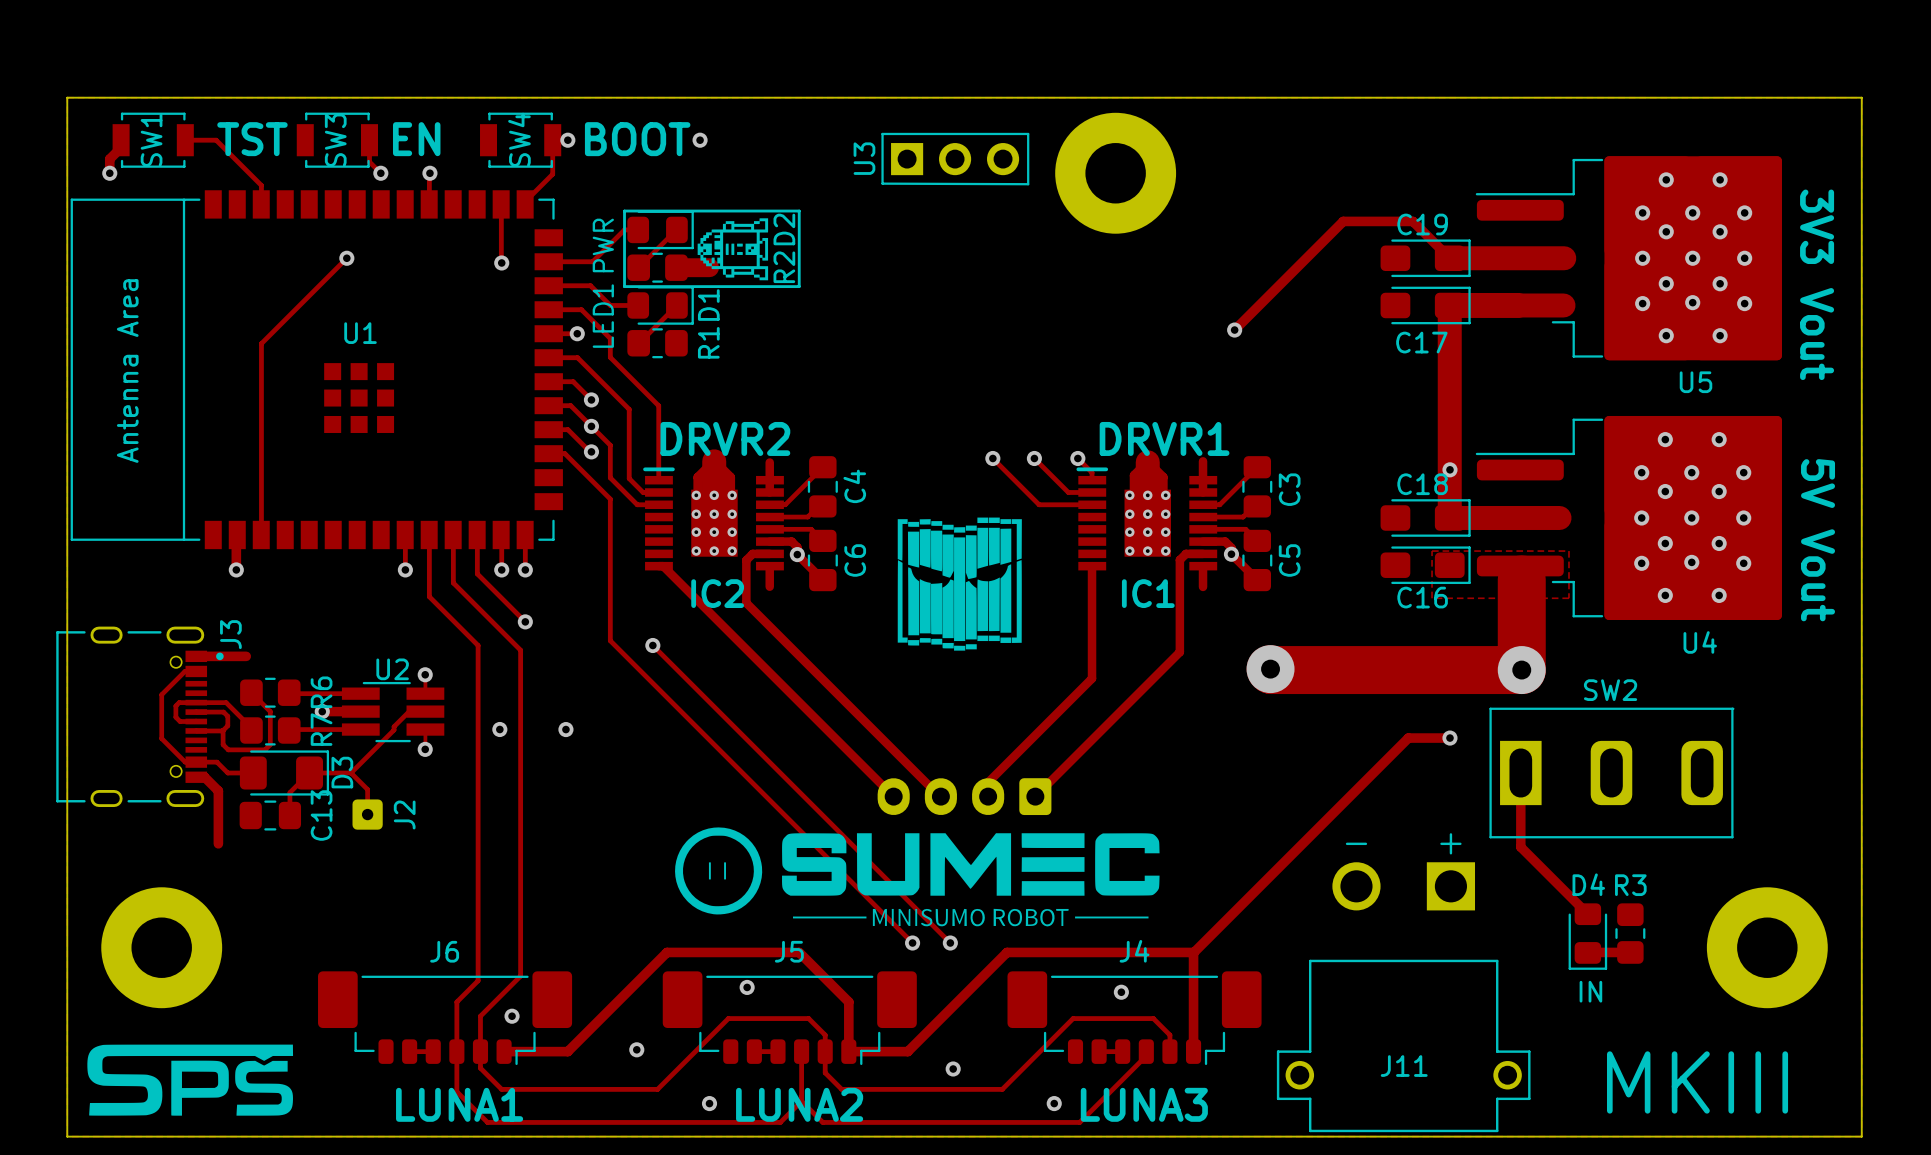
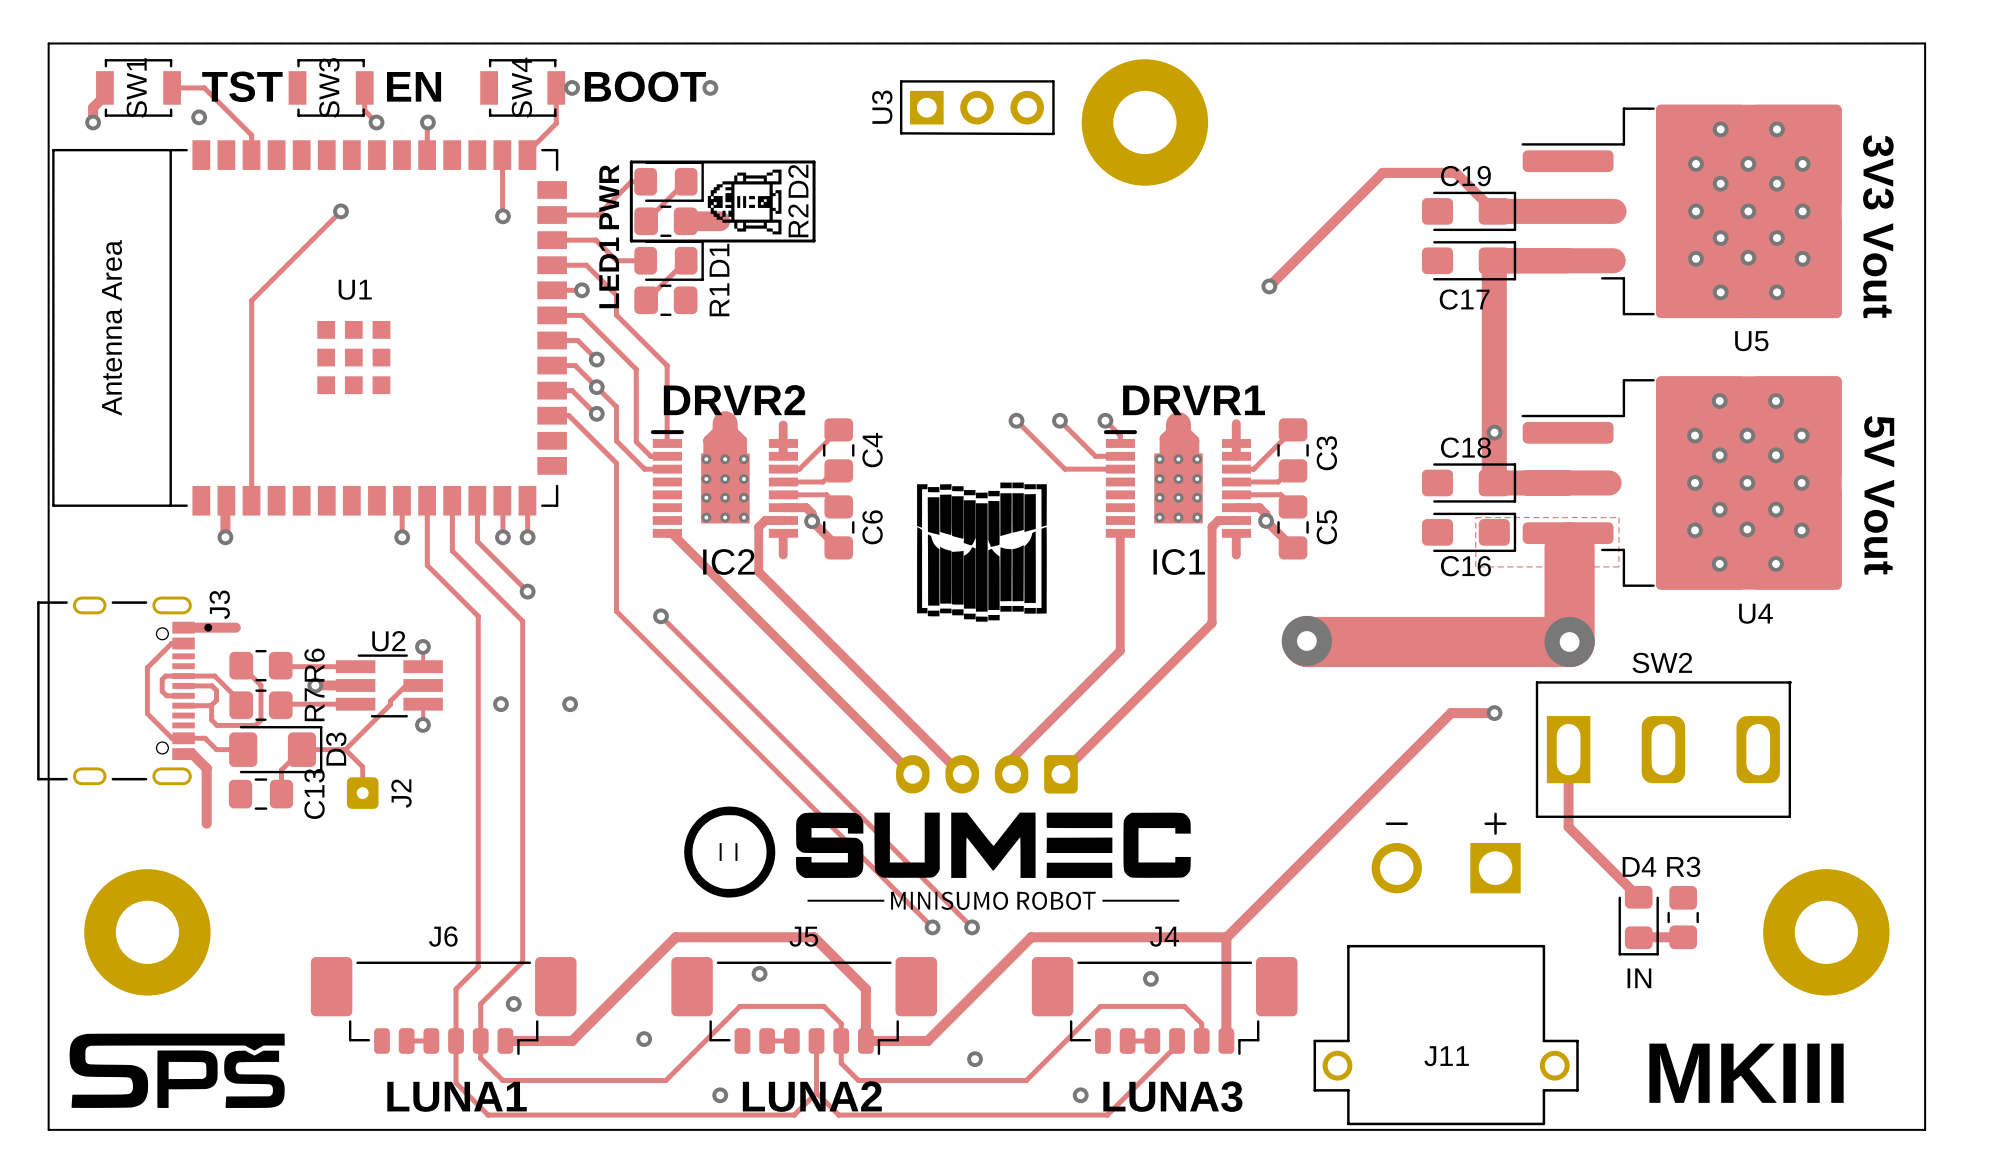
via: none -> (199, 117)

